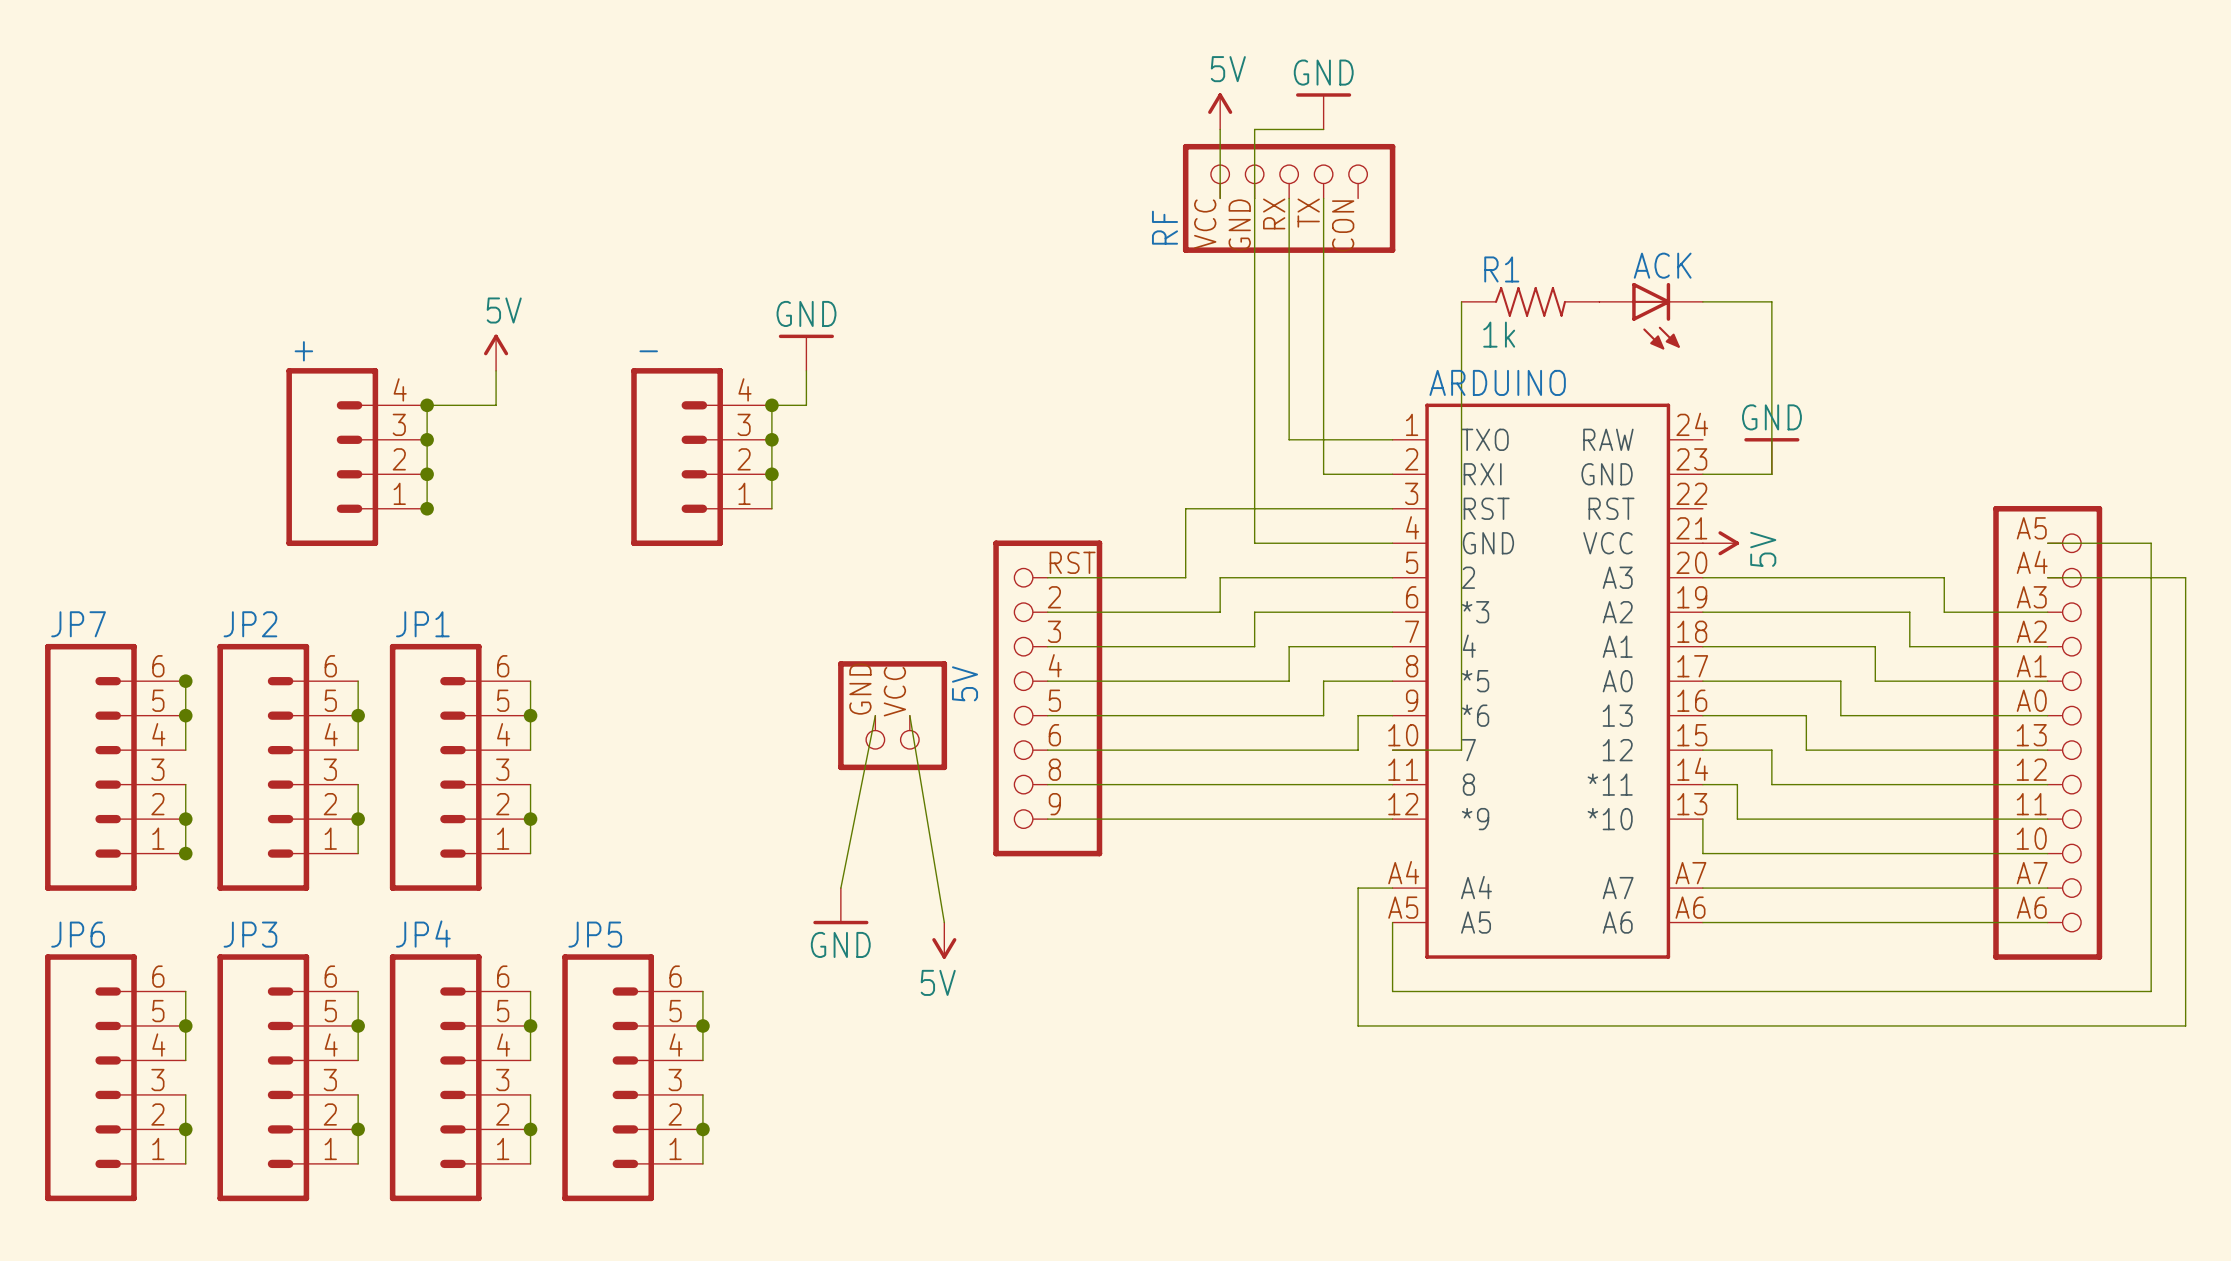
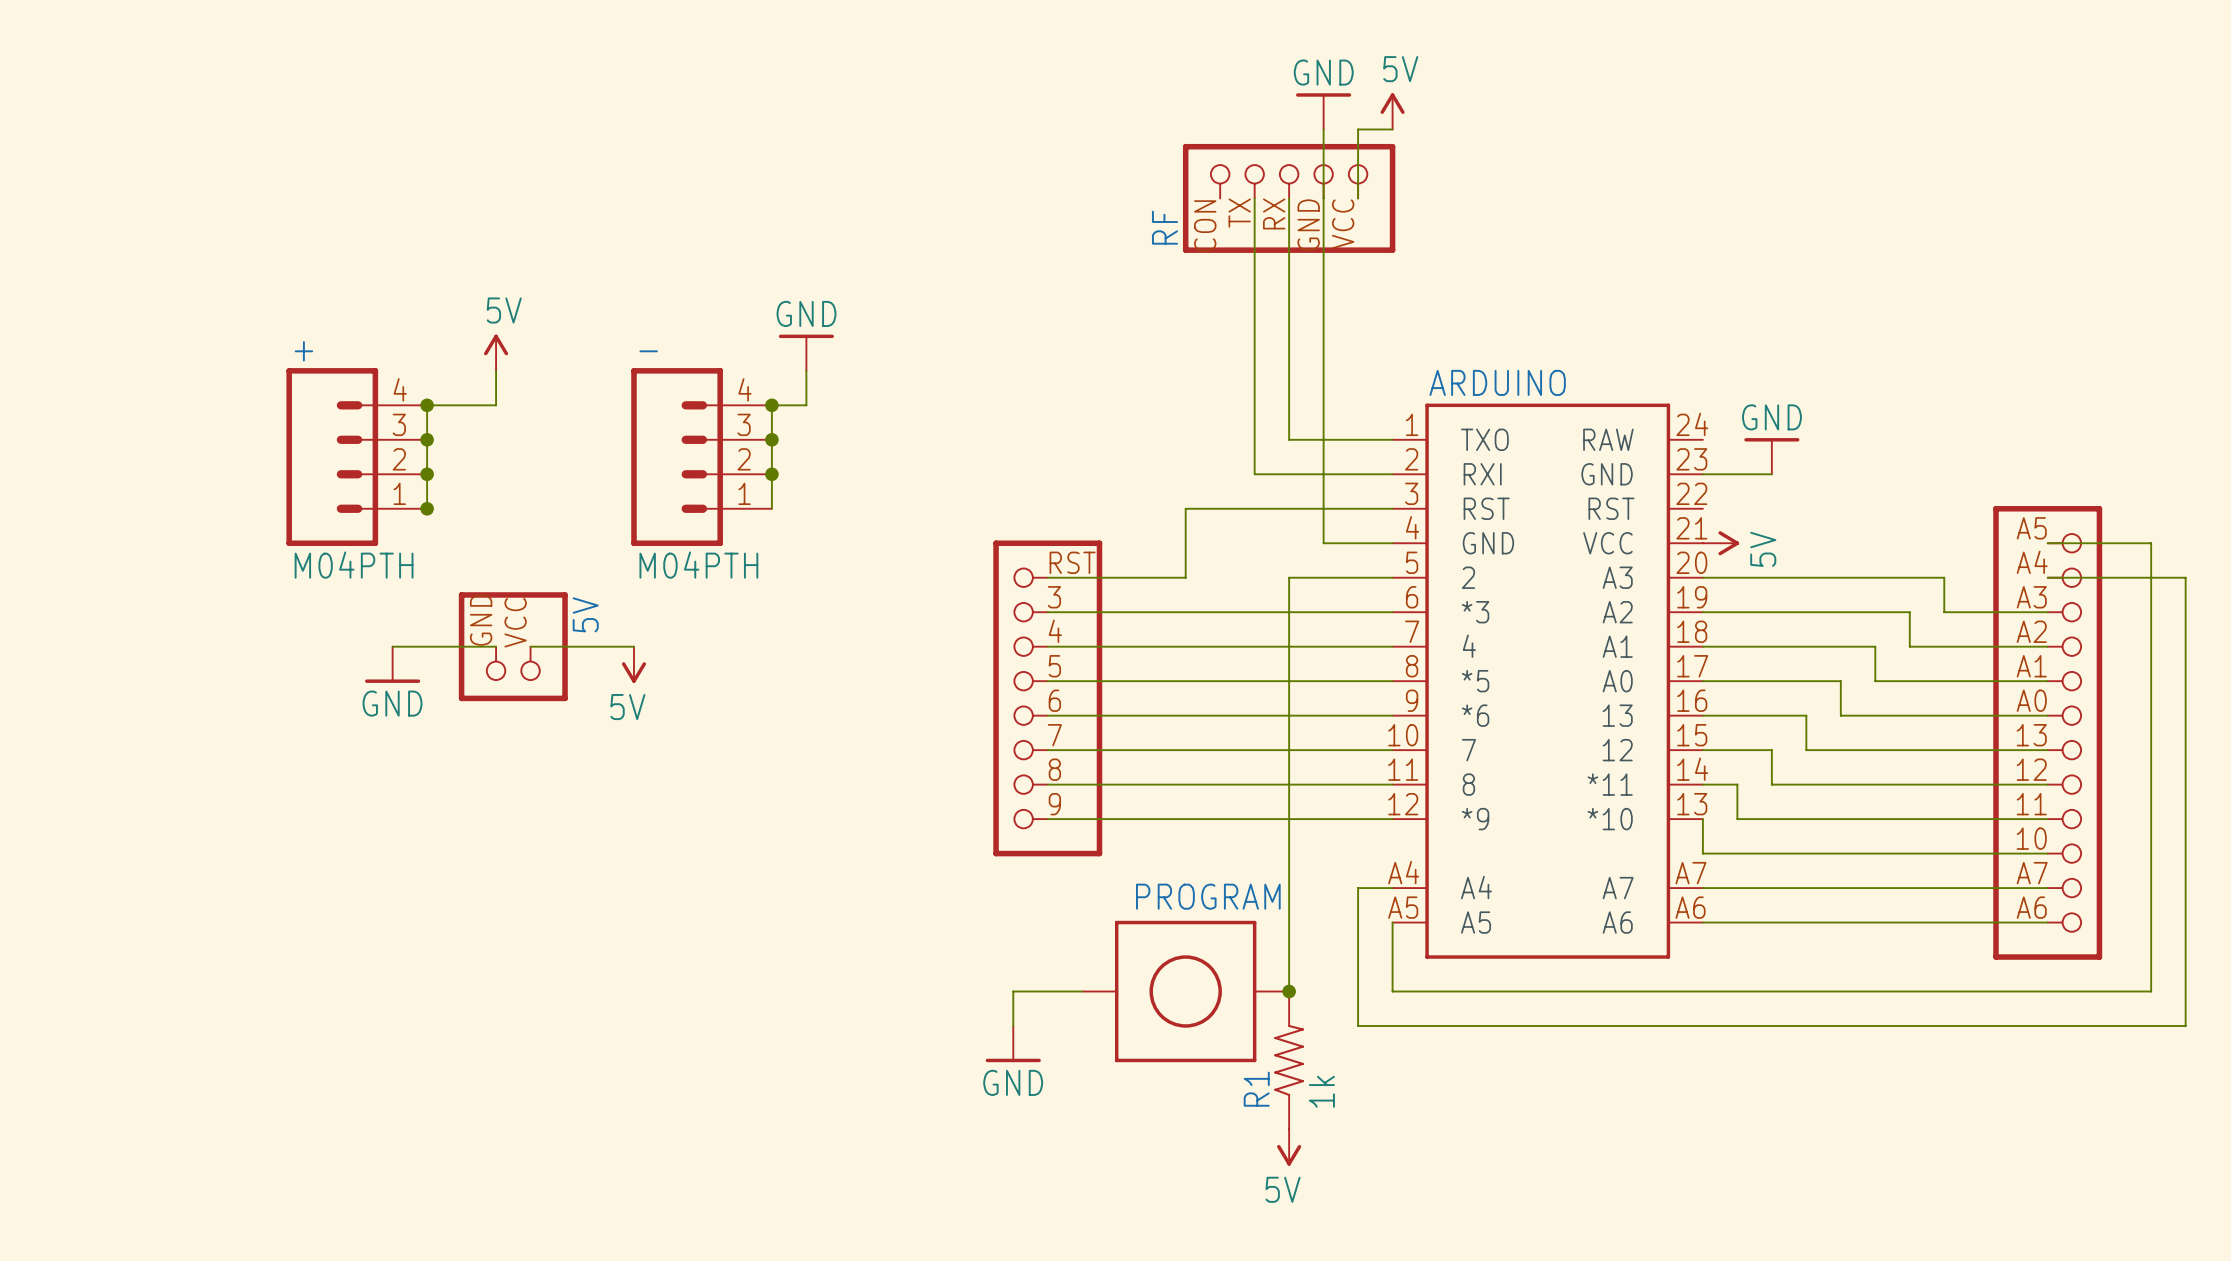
power symbol position: 5V (1220, 111) -> 5V (1392, 111)
wire: (1220, 129) (1220, 198) -> none
wire: (1323, 129) (1254, 129) (1254, 198) -> (1323, 129) (1323, 198)
wire: none -> (1392, 129) (1358, 129) (1358, 198)
RF flip: as is (1289, 198) -> left-right (1289, 198)
wire: (1461, 301) (1461, 750) (1392, 750) -> none
R1 rotation: 0° (1530, 301) -> 90° counterclockwise (1289, 1060)
R1 position: (1530, 301) -> (1289, 1060)
wire: (1702, 301) (1771, 301) (1771, 474) -> none
ACK: (1651, 316) -> none
wire: (1254, 474) (1254, 543) (1323, 543) -> (1254, 474) (1323, 474) (1323, 543)
part value: none -> M04PTH (354, 565)
part value: none -> M04PTH (698, 565)
wire: (1289, 577) (1220, 577) (1220, 612) -> (1289, 577) (1289, 646) (1254, 646)
part pin number: 2 (1054, 597) -> 3 (1054, 597)
wire: (1254, 612) (1254, 646) -> (1254, 612) (1220, 612)
part pin number: 3 (1054, 631) -> 4 (1055, 631)
wire: none -> (530, 646) (633, 646)
power symbol: none -> GND (392, 664)
power symbol: none -> 5V (633, 664)
part pin number: 4 (1055, 665) -> 5 (1054, 666)
wire: (185, 681) (185, 750) -> none
junction: (185, 681) -> none
wire: (358, 681) (358, 750) -> none
wire: (530, 681) (530, 750) -> none
wire: (1323, 681) (1323, 715) -> (1358, 715) (1323, 715)
wire: none -> (1323, 681) (1289, 681) (1289, 991)
part pin number: 5 (1054, 700) -> 6 (1054, 700)
junction: (185, 715) -> none
junction: (358, 715) -> none
junction: (530, 715) -> none
wire: (875, 715) (840, 888) -> none
5V position: (892, 715) -> (513, 646)
wire: (909, 715) (944, 922) -> none
wire: (1358, 715) (1358, 750) -> (1392, 750) (1358, 750)
part pin number: 6 (1054, 735) -> 7 (1054, 735)
JP7: (115, 767) -> none
JP2: (287, 767) -> none
JP1: (460, 767) -> none
wire: (185, 784) (185, 853) -> none
wire: (358, 784) (358, 853) -> none
wire: (530, 784) (530, 853) -> none
junction: (185, 819) -> none
junction: (358, 819) -> none
junction: (530, 819) -> none
junction: (185, 853) -> none
power symbol position: GND (840, 906) -> GND (1013, 1044)
power symbol: 5V (944, 940) -> none
wire: (185, 991) (185, 1060) -> none
wire: (358, 991) (358, 1060) -> none
wire: (530, 991) (530, 1060) -> none
wire: (702, 991) (702, 1060) -> none
wire: none -> (1082, 991) (1013, 991) (1013, 1025)
PROGRAM: none -> (1185, 991)
junction: none -> (1289, 991)
junction: (185, 1025) -> none
junction: (358, 1025) -> none
junction: (530, 1025) -> none
junction: (702, 1025) -> none
JP6: (115, 1077) -> none
JP3: (287, 1077) -> none
JP4: (460, 1077) -> none
JP5: (632, 1077) -> none
wire: (185, 1094) (185, 1163) -> none
wire: (358, 1094) (358, 1163) -> none
wire: (530, 1094) (530, 1163) -> none
wire: (702, 1094) (702, 1163) -> none
junction: (185, 1129) -> none
junction: (358, 1129) -> none
junction: (530, 1129) -> none
junction: (702, 1129) -> none
power symbol: none -> 5V (1289, 1147)

